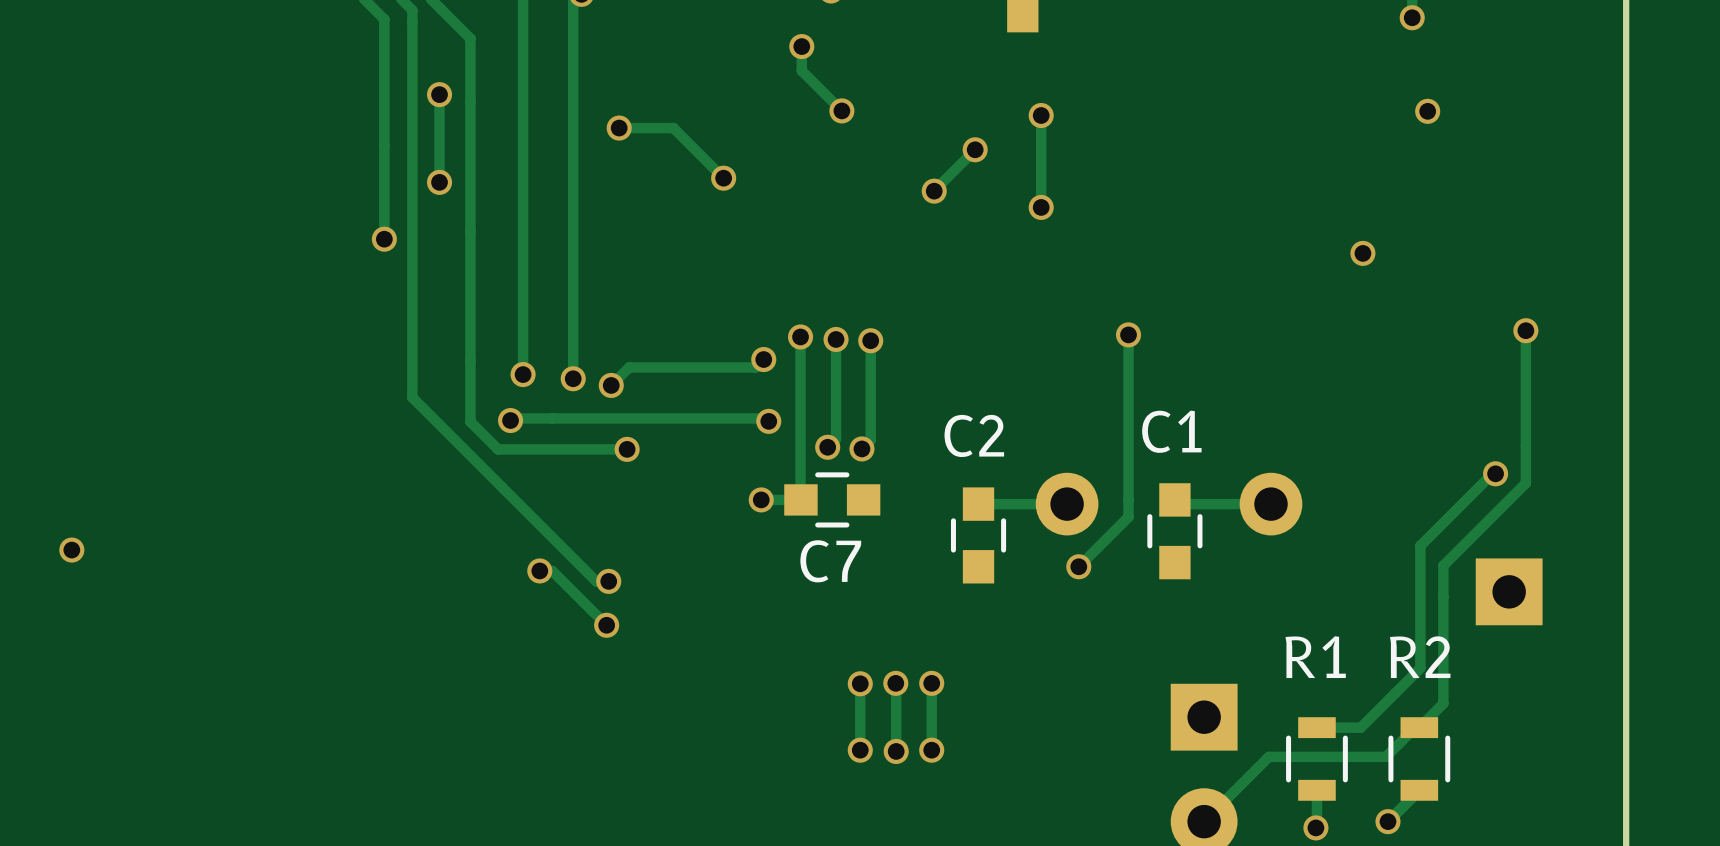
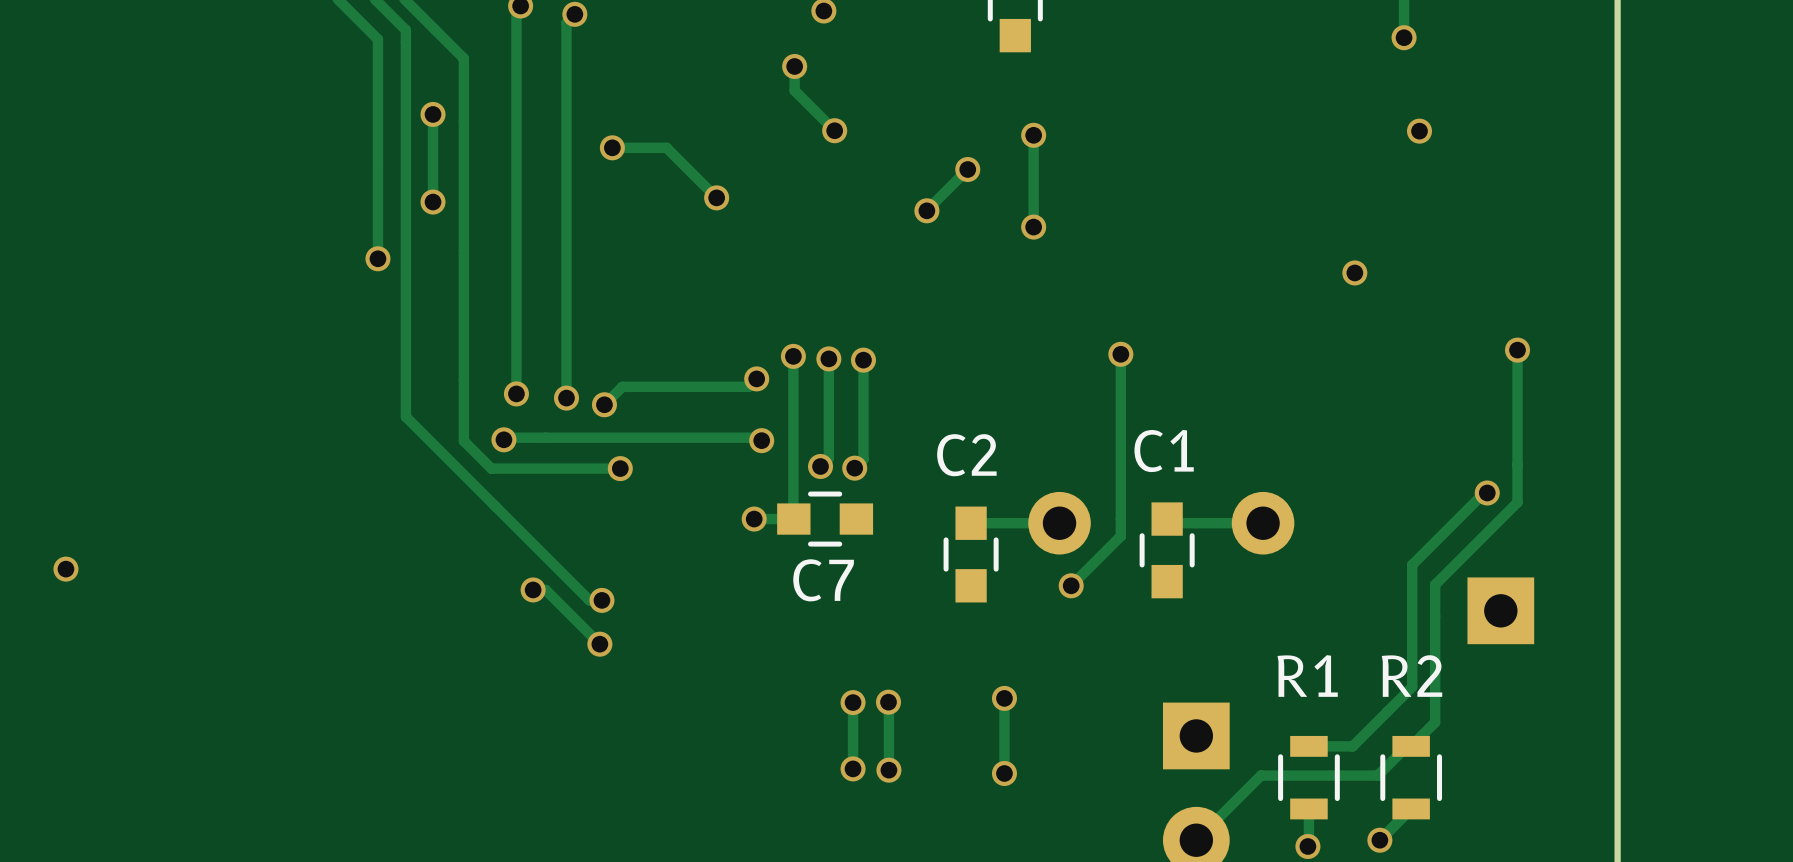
track: none -> (1004, 698) (1004, 773)
via: none -> (1004, 698)
track: (931, 683) (931, 750) -> none
via: (931, 683) -> none
via: (931, 750) -> none
via: none -> (1004, 773)

